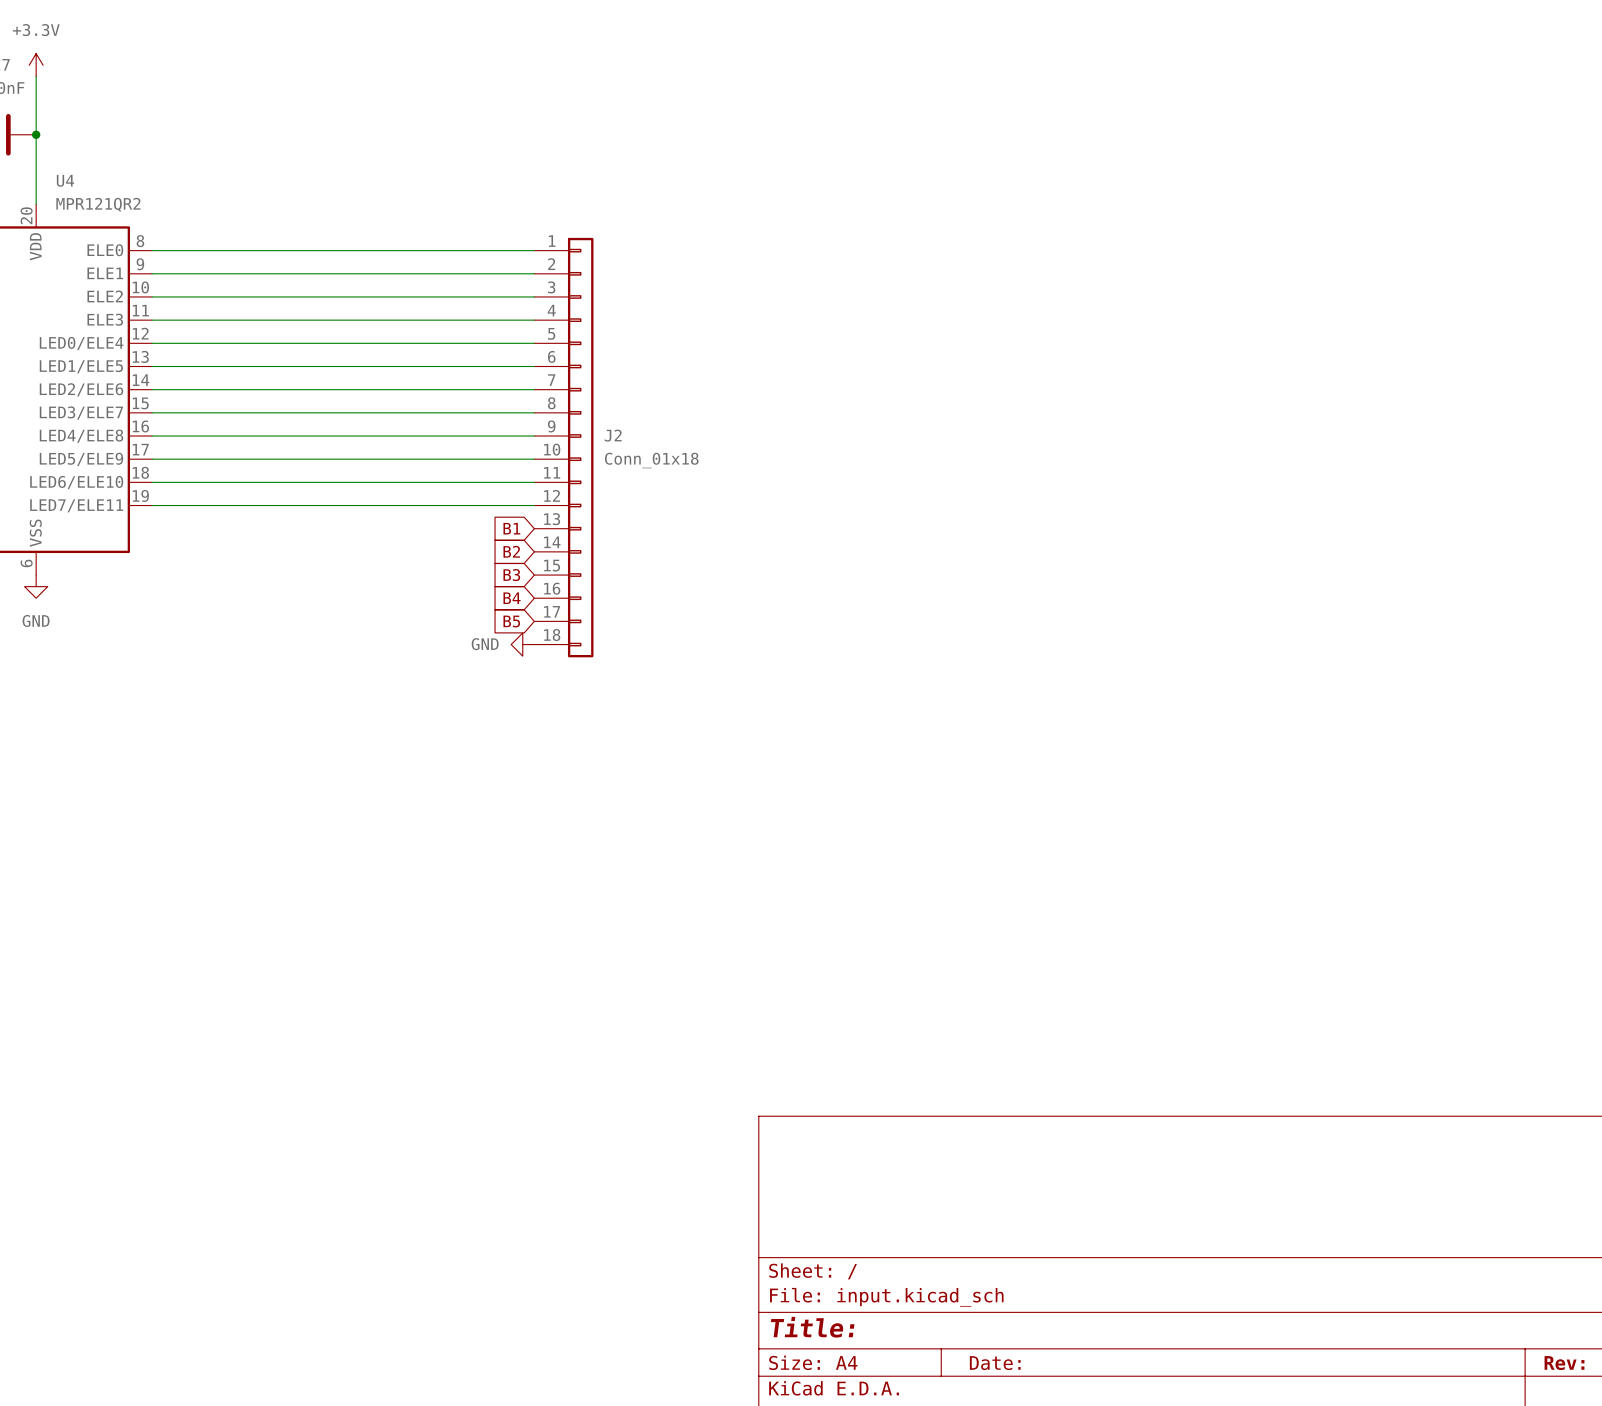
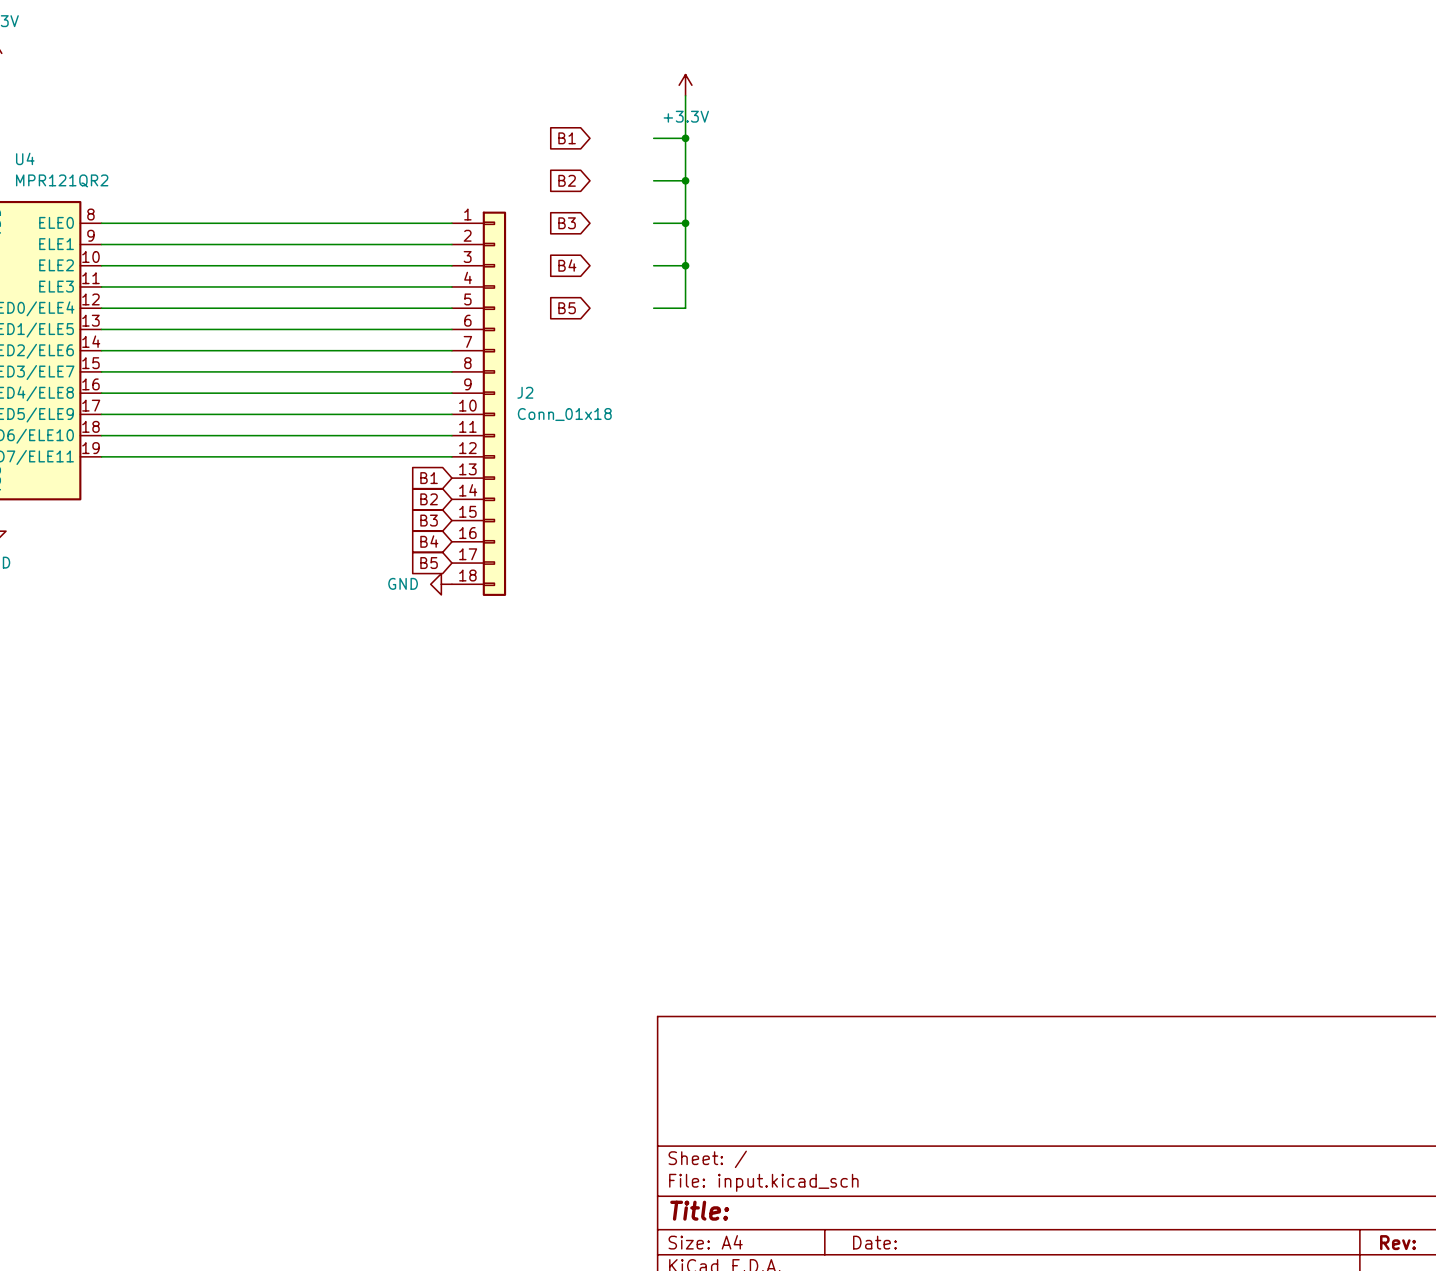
power symbol: none -> +3.3V (685, 85)
wire: none -> (685, 95) (685, 308) (653, 308)
global label: none -> B1 (567, 138)
wire: none -> (653, 138) (685, 138)
junction: none -> (685, 138)
global label: none -> B2 (567, 180)
wire: none -> (653, 180) (685, 180)
junction: none -> (685, 180)
global label: none -> B3 (567, 223)
wire: none -> (653, 223) (685, 223)
junction: none -> (685, 223)
global label: none -> B4 (567, 265)
wire: none -> (653, 265) (685, 265)
junction: none -> (685, 265)
global label: none -> B5 (567, 308)

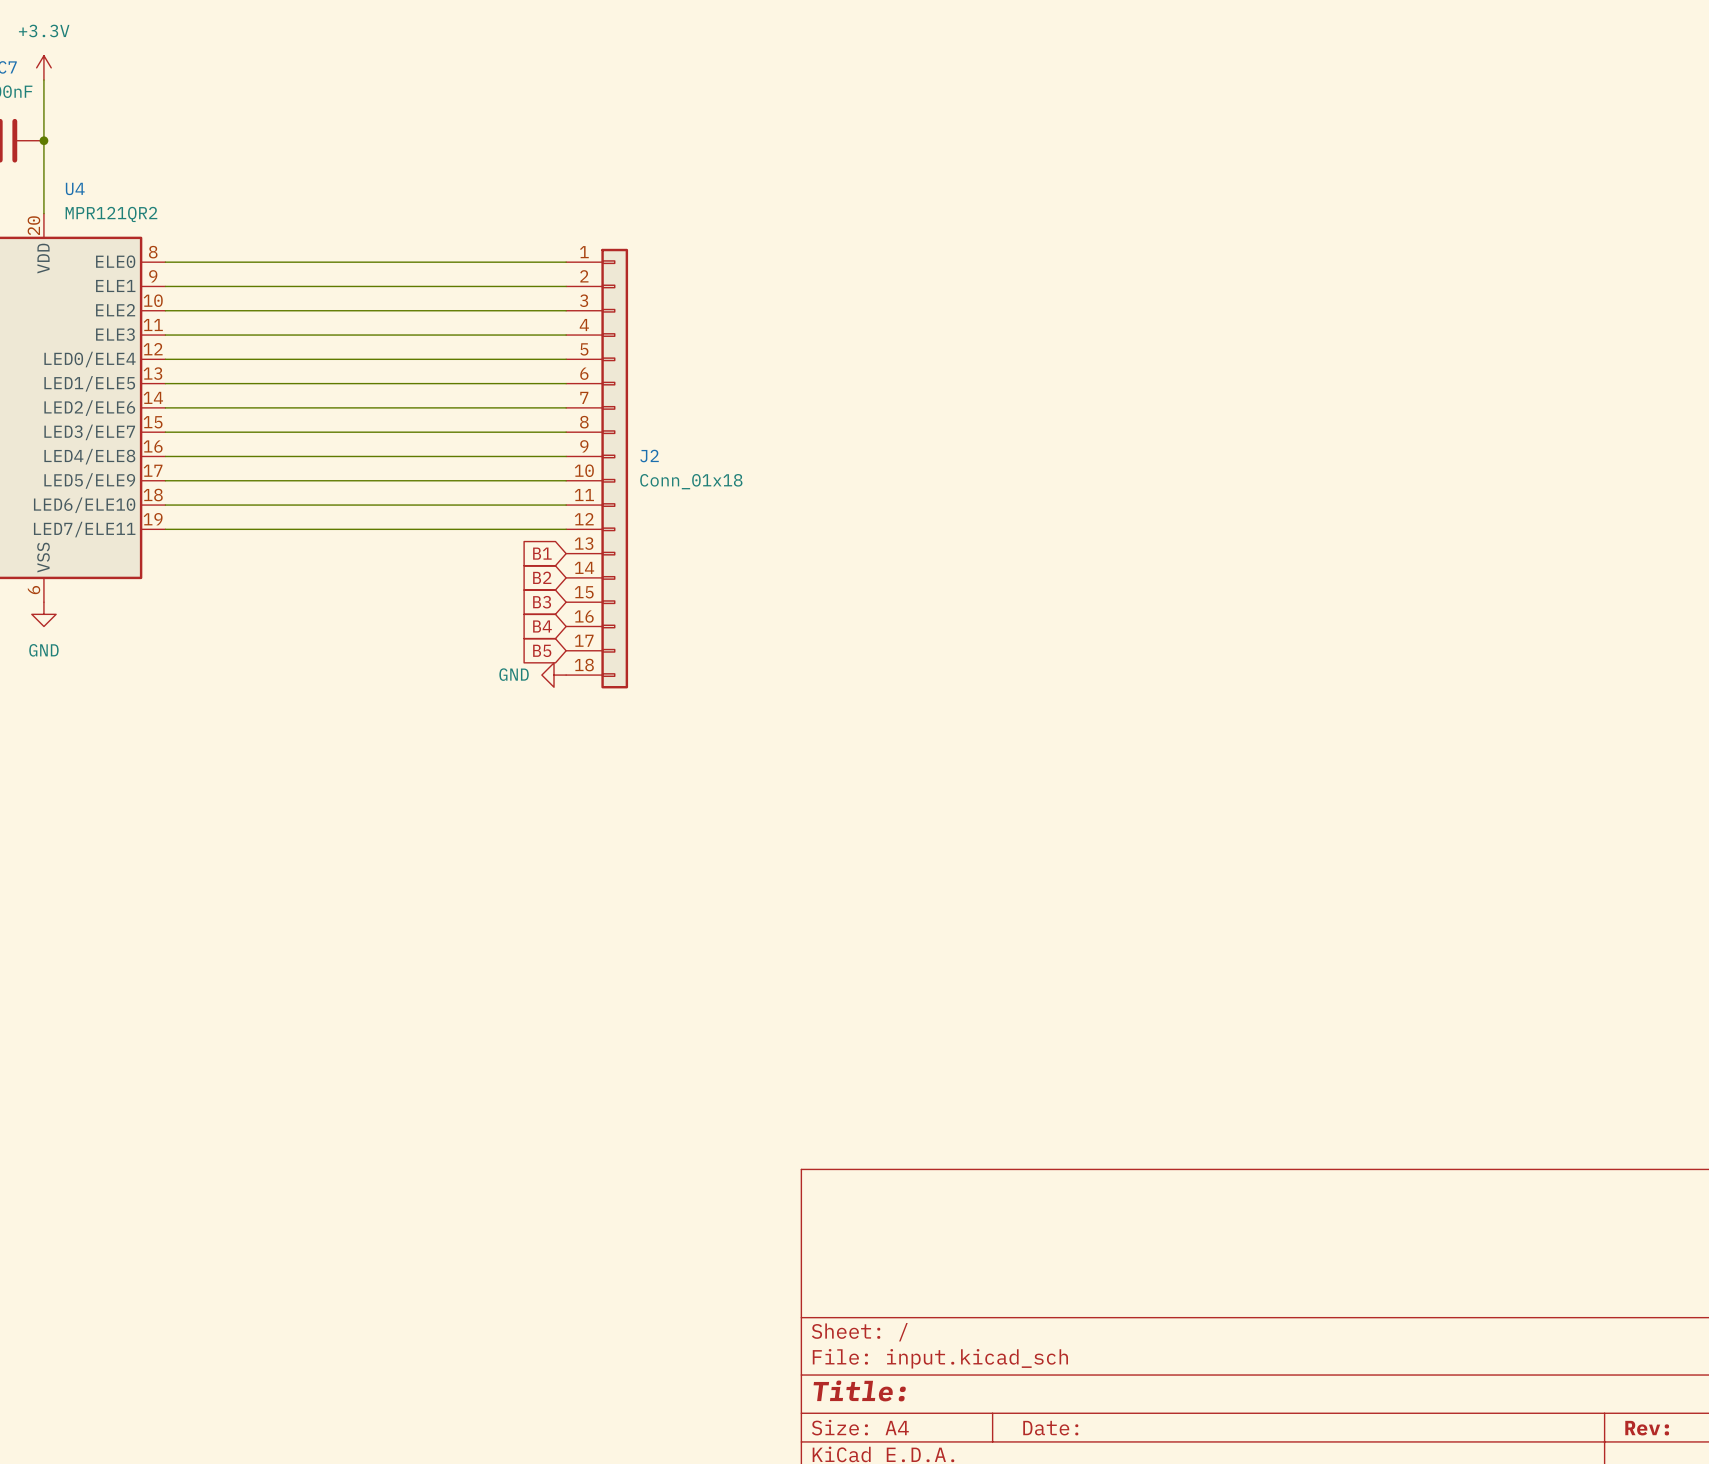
power symbol: +3.3V (685, 85) -> none
wire: (685, 95) (685, 308) (653, 308) -> none
global label: B1 (567, 138) -> none
wire: (653, 138) (685, 138) -> none
junction: (685, 138) -> none
global label: B2 (567, 180) -> none
wire: (653, 180) (685, 180) -> none
junction: (685, 180) -> none
global label: B3 (567, 223) -> none
wire: (653, 223) (685, 223) -> none
junction: (685, 223) -> none
global label: B4 (567, 265) -> none
wire: (653, 265) (685, 265) -> none
junction: (685, 265) -> none
global label: B5 (567, 308) -> none

